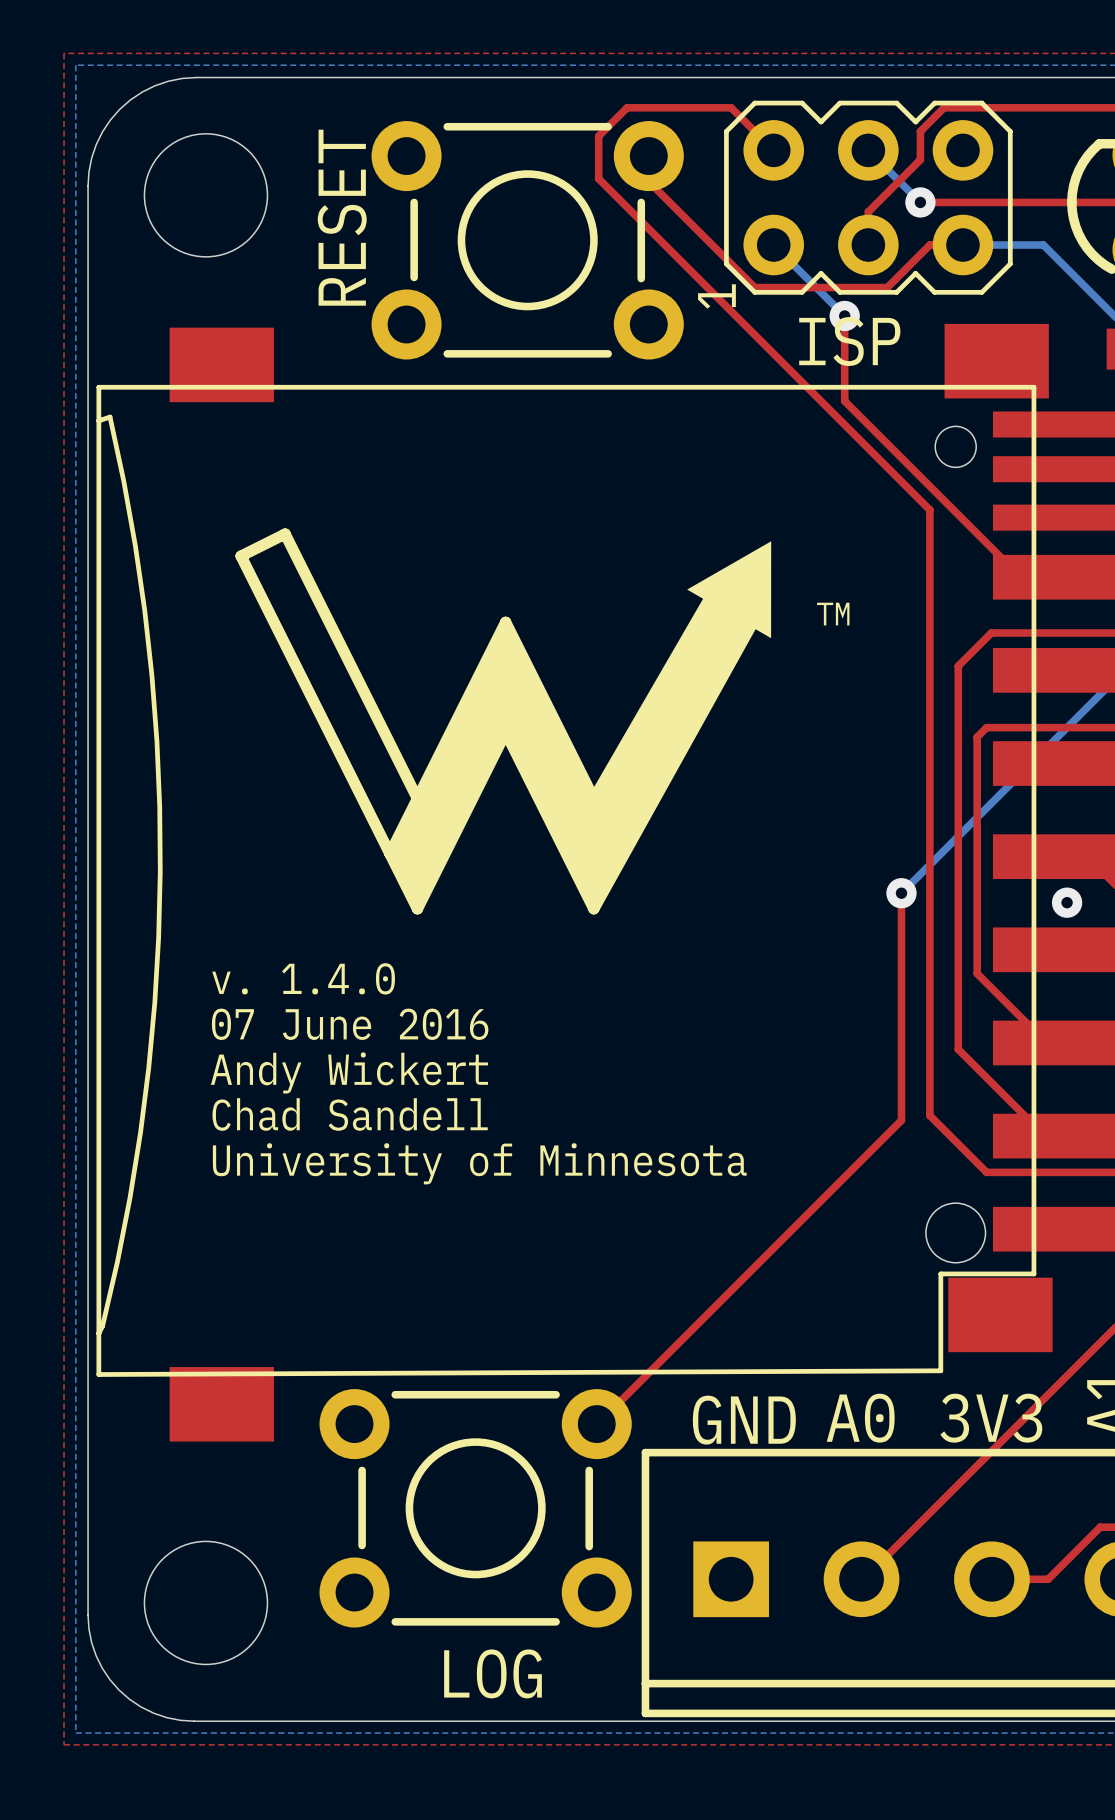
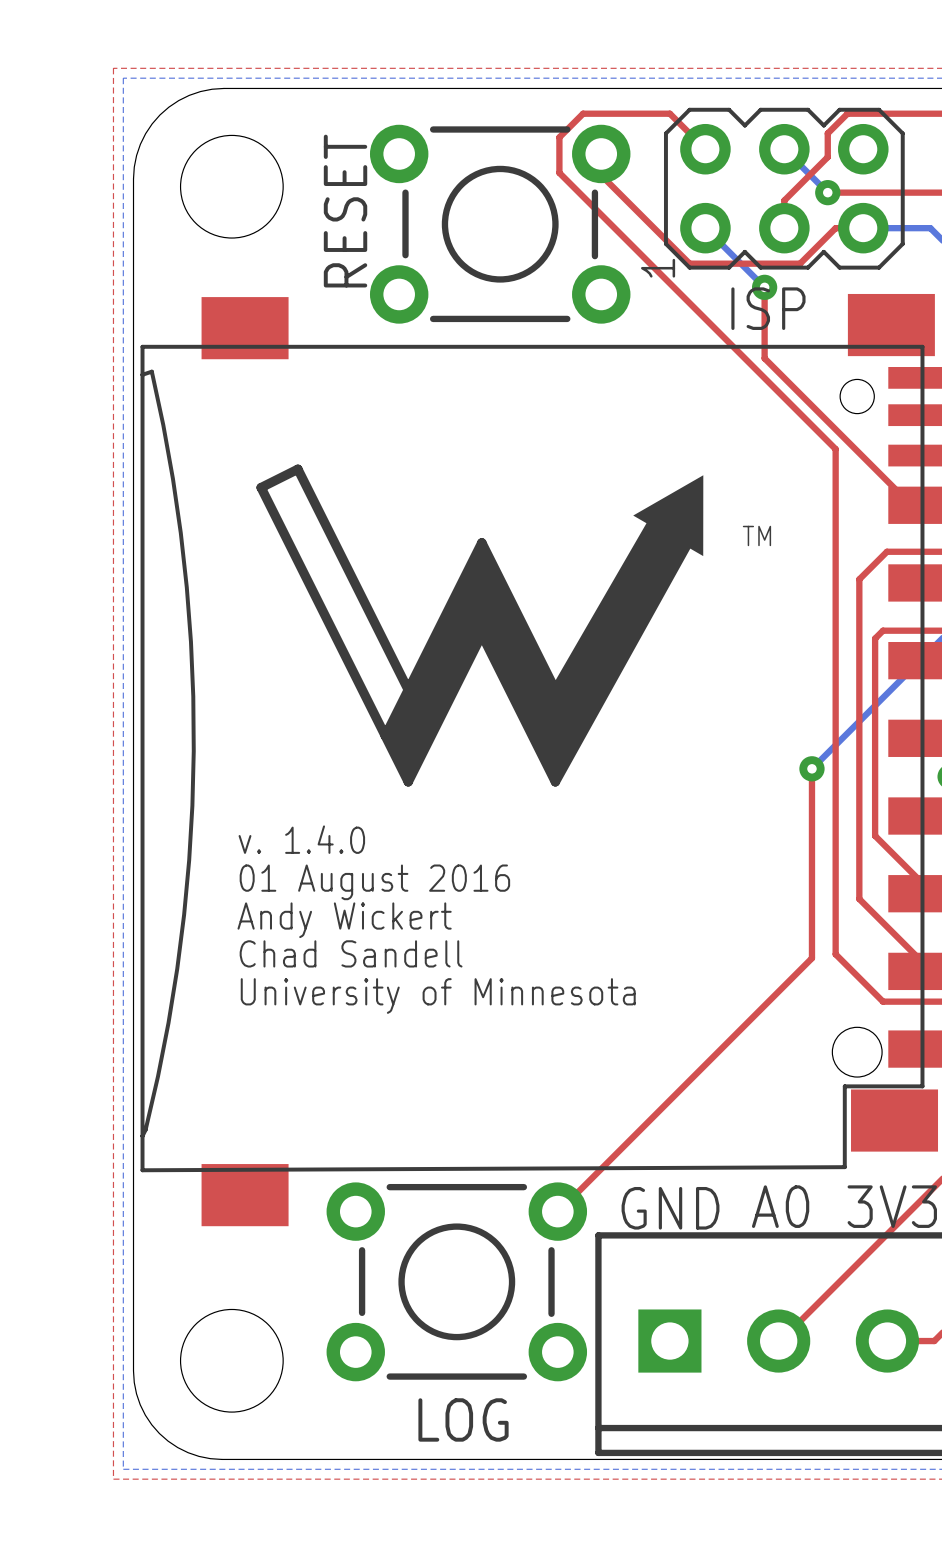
text: 07 June 2016 (350, 1024) -> 01 August 2016 (374, 882)

